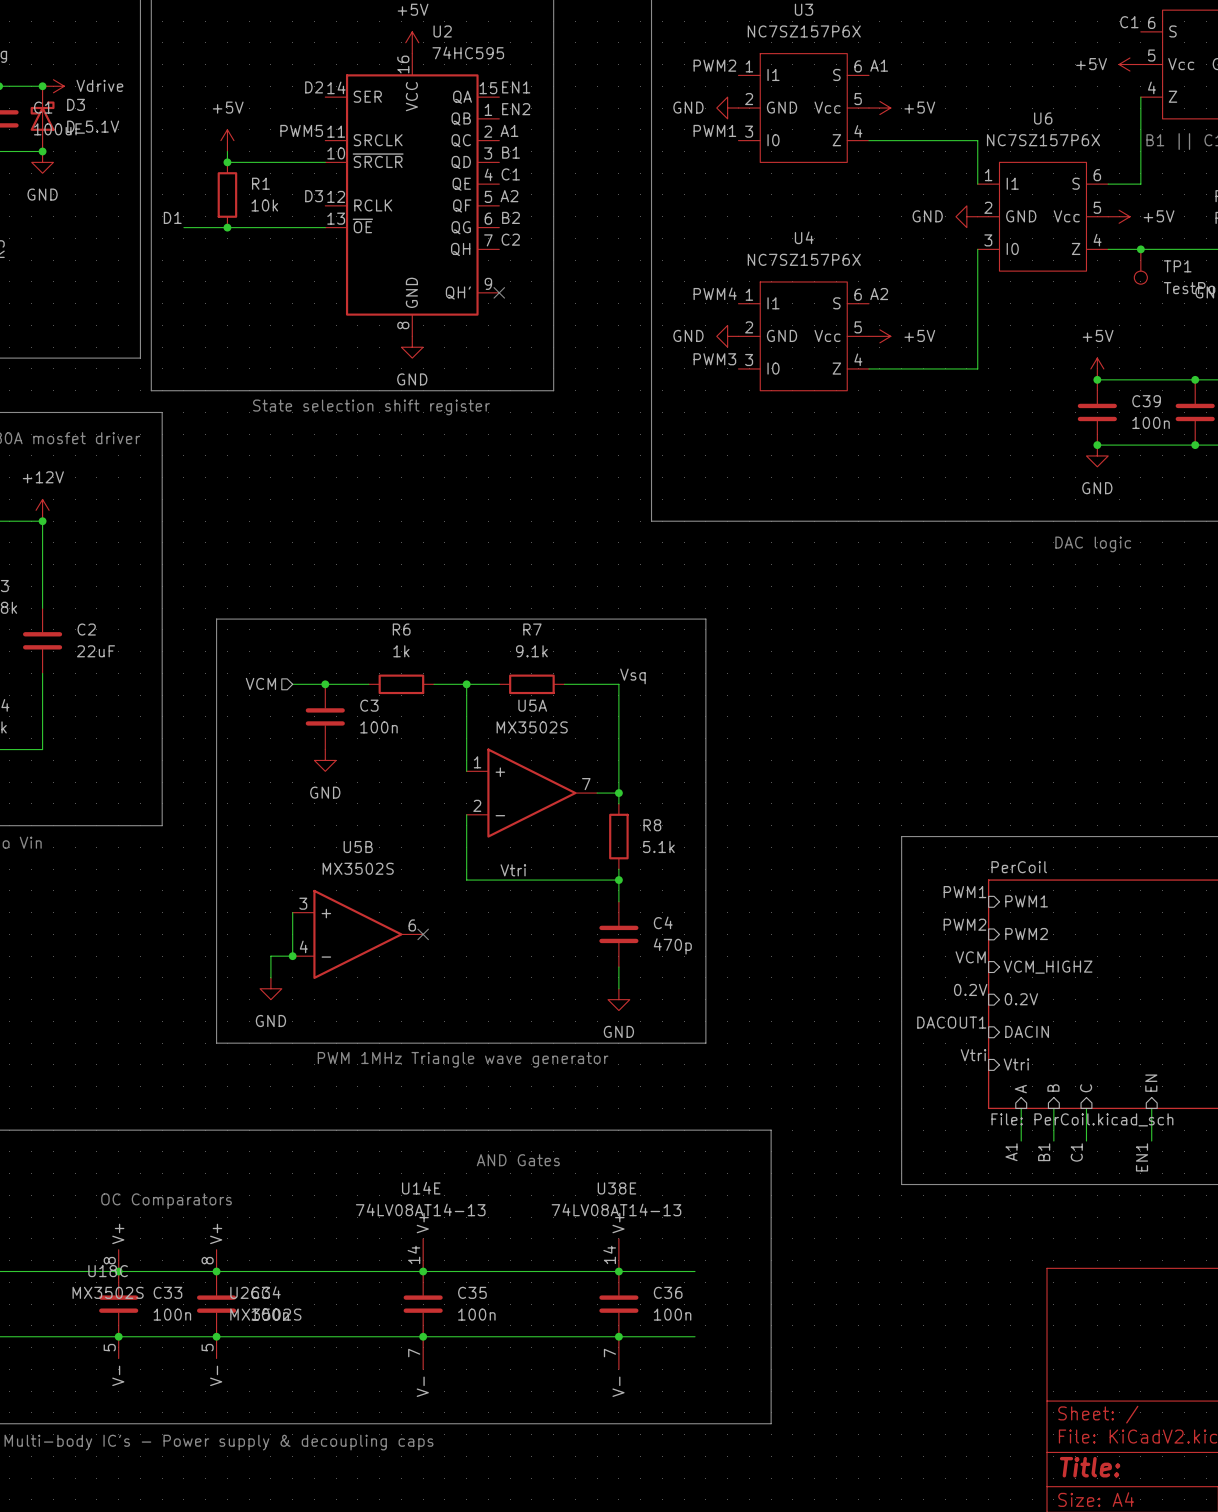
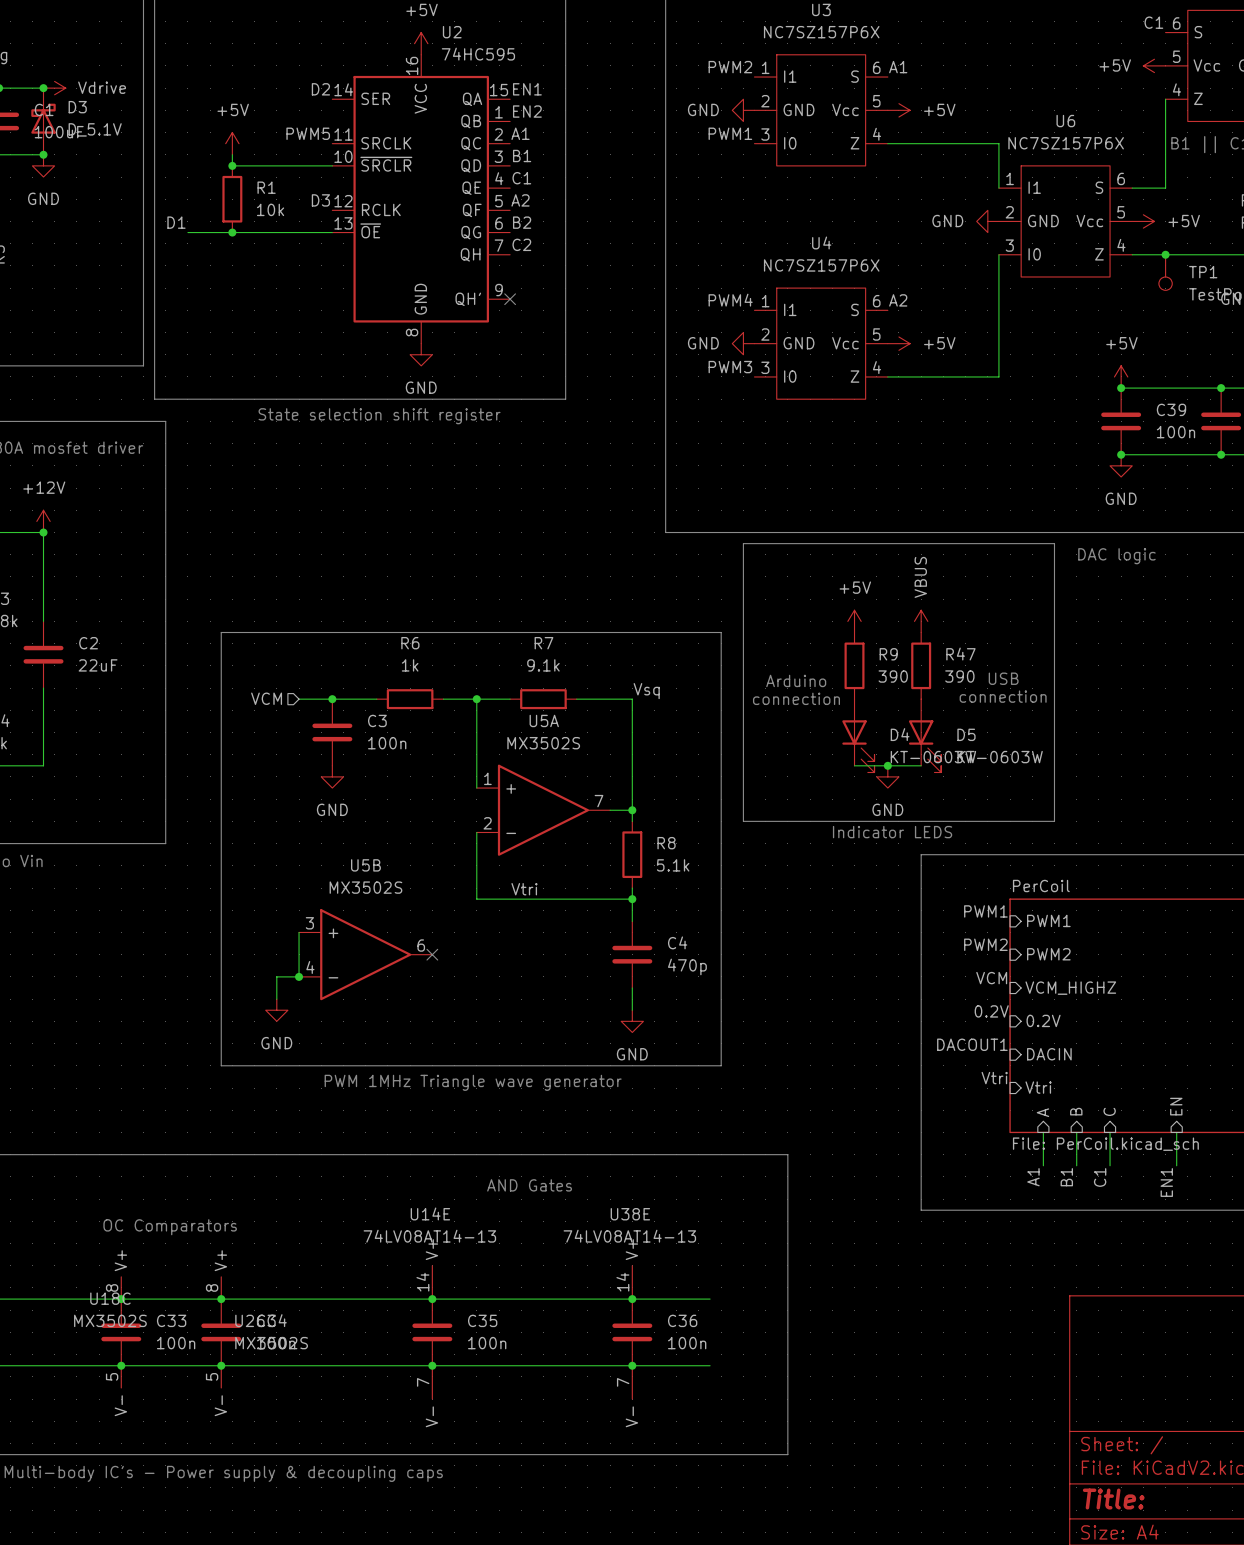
line: none -> (743, 543) (1054, 543) (1054, 821) (743, 821) (743, 543)
power symbol: none -> +5V (854, 621)
power symbol: none -> VBUS (921, 621)
R9: none -> 390 (854, 665)
R47: none -> 390 (921, 665)
text: none -> USB (1003, 678)
text: none -> Arduino (796, 680)
text: none -> connection (1003, 696)
text: none -> connection (796, 698)
D4: none -> KT-0603W (858, 735)
D5: none -> KT-0603W (925, 735)
wire: none -> (854, 765) (921, 765)
junction: none -> (887, 765)
power symbol: none -> GND (887, 776)
text: none -> Indicator LEDS (892, 832)

